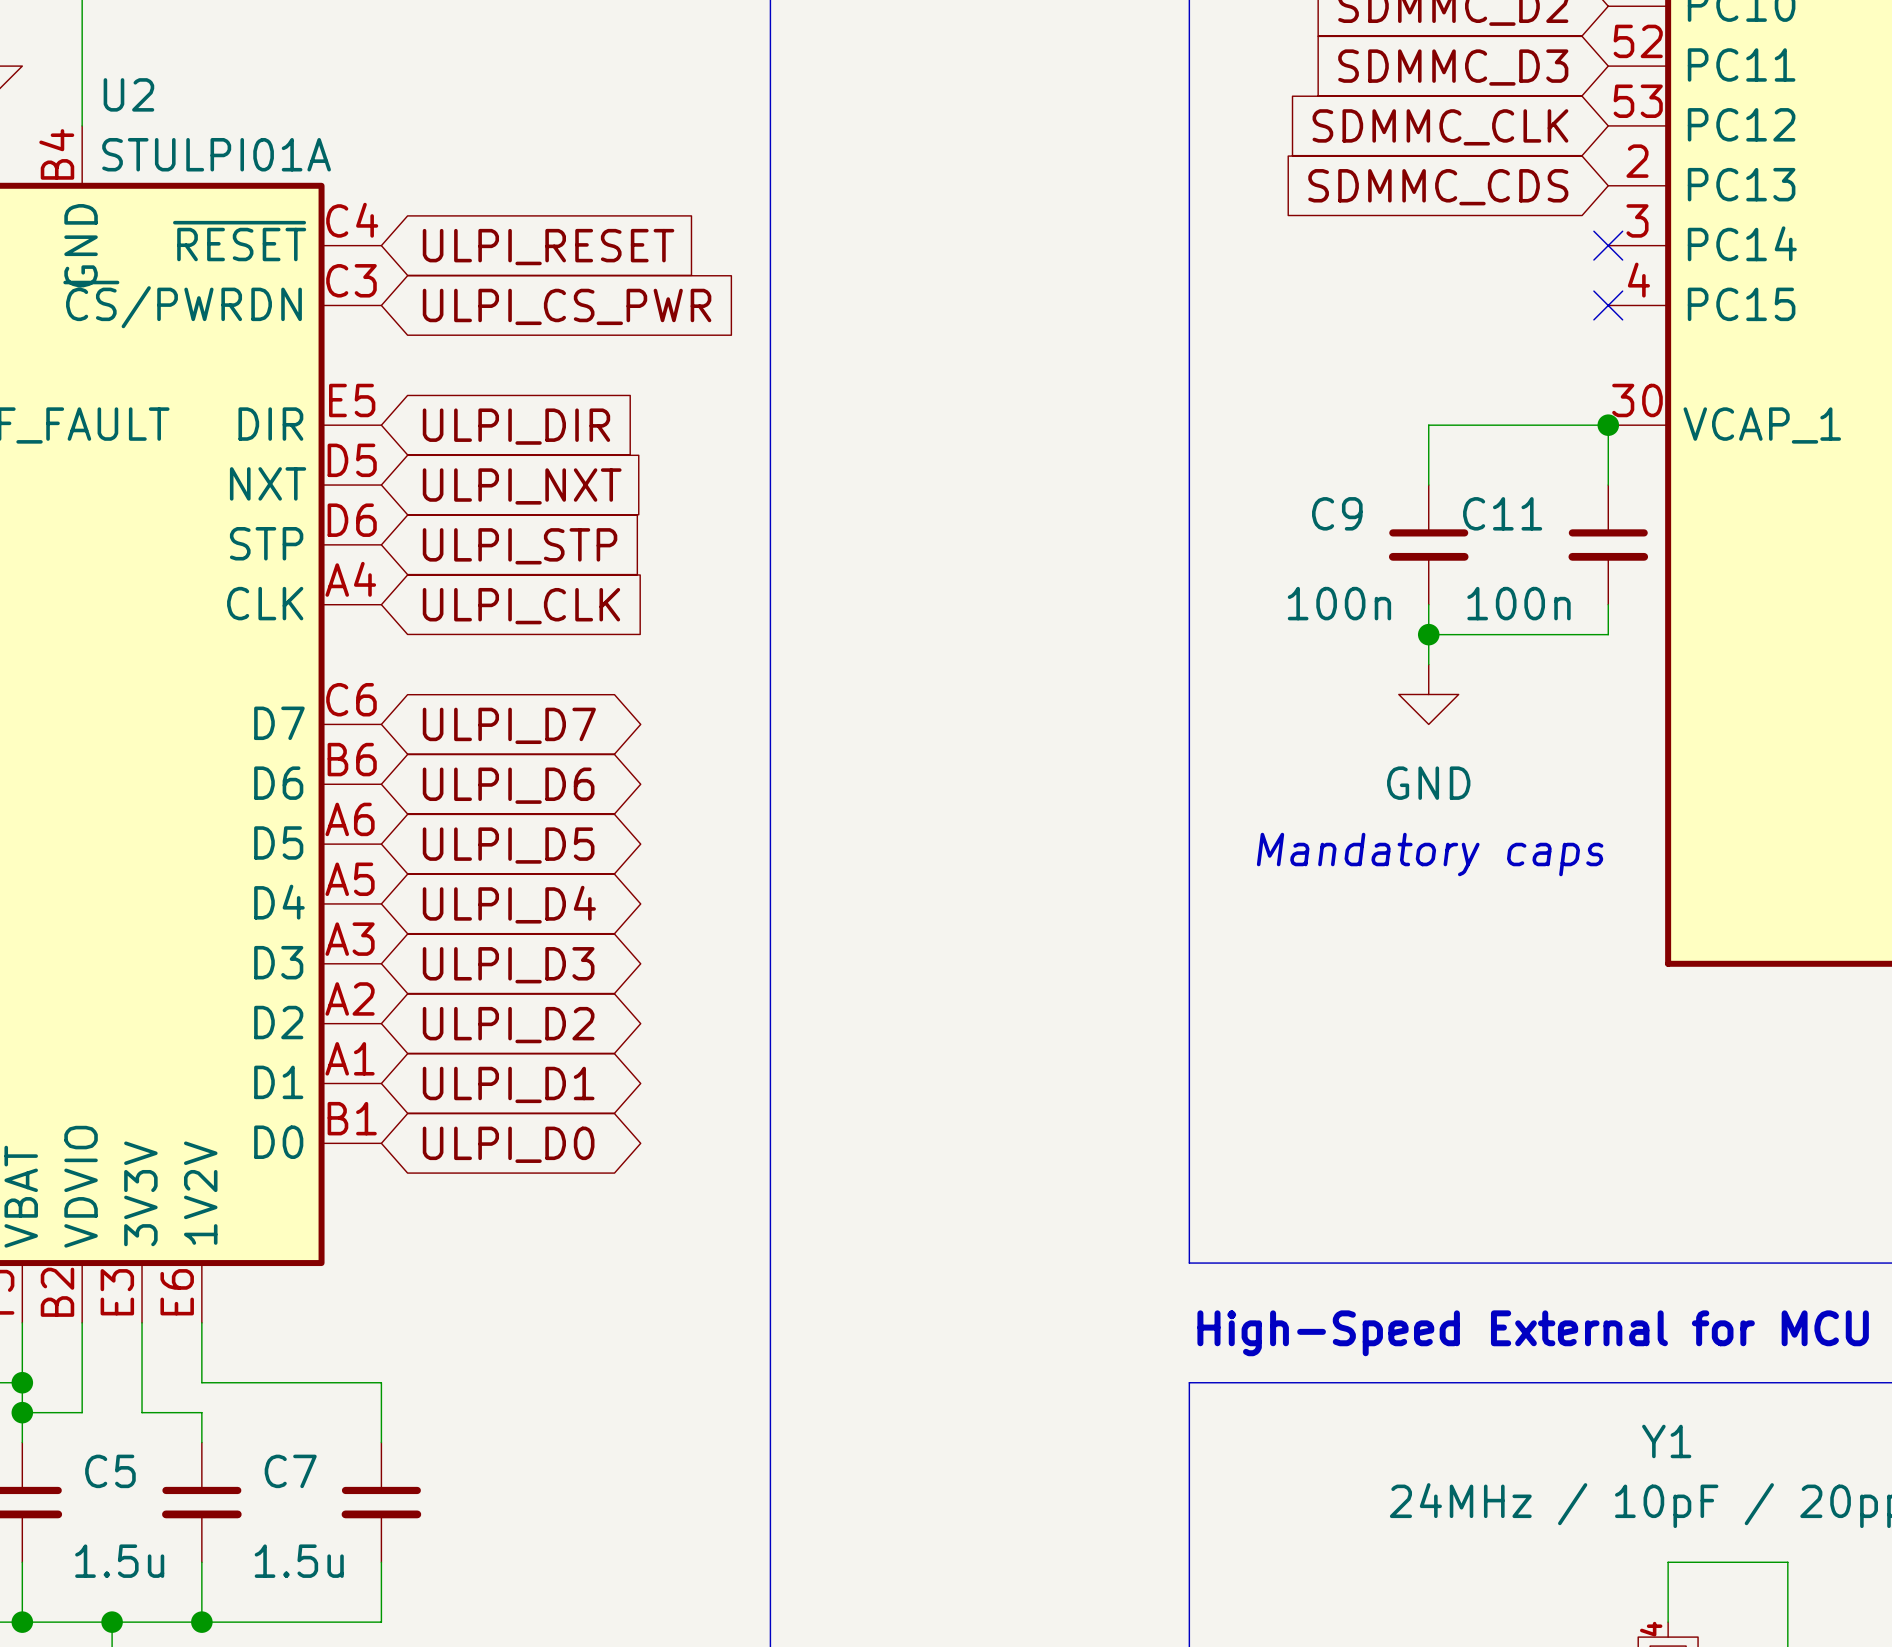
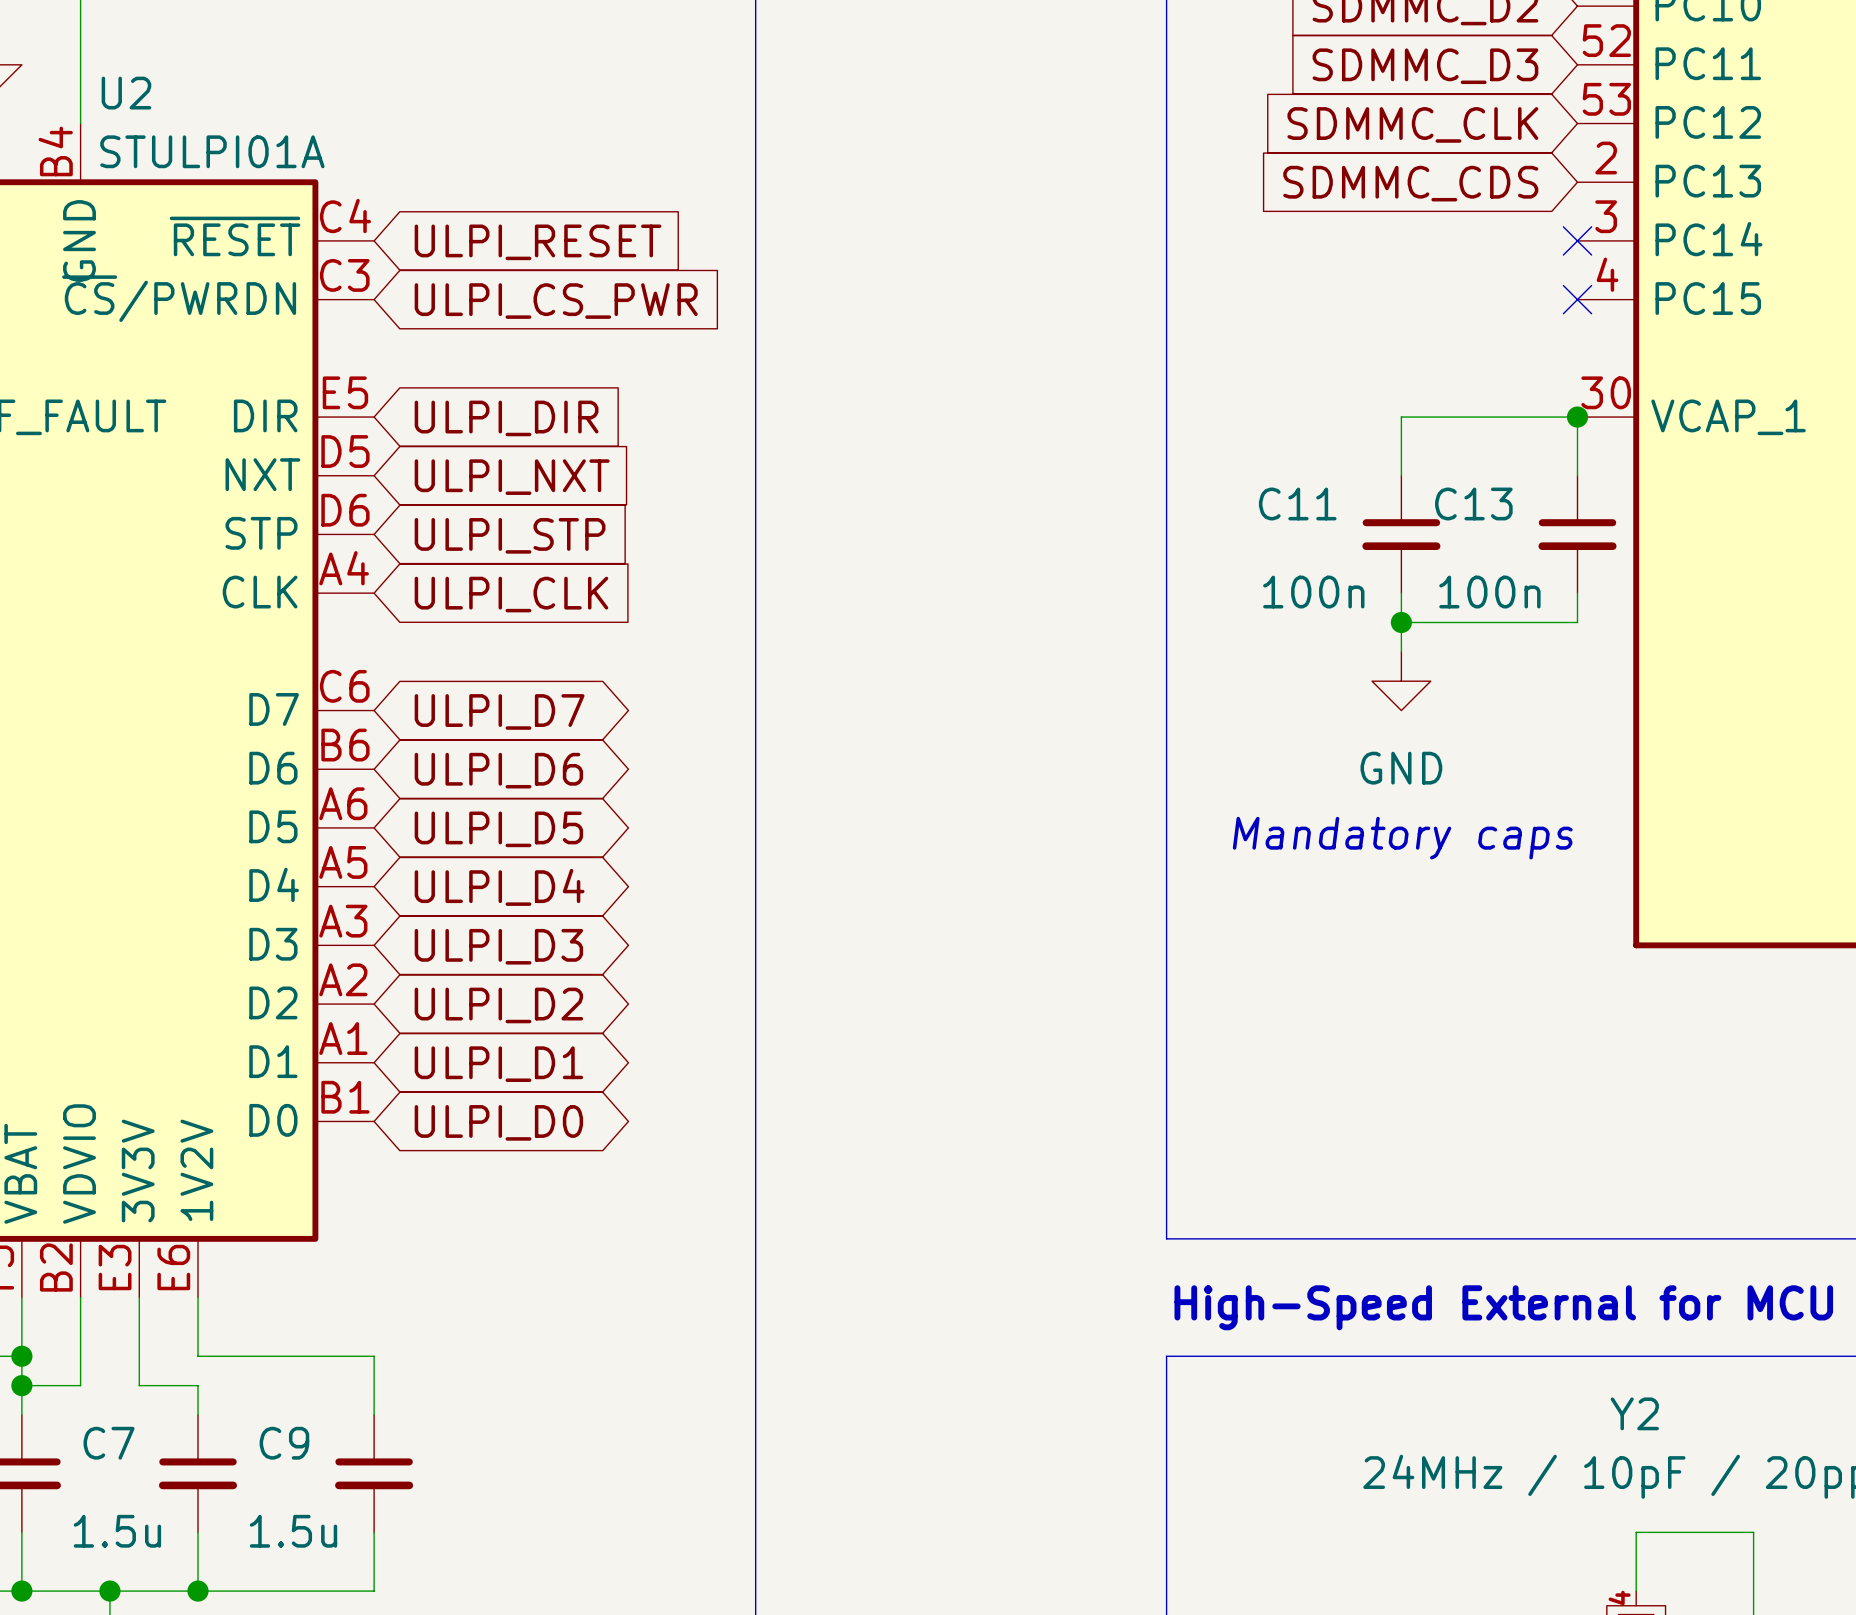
C9 name: C9 (1337, 513) -> C11 (1297, 503)
C11 name: C11 (1502, 513) -> C13 (1473, 503)
Y1 name: Y1 (1666, 1441) -> Y2 (1634, 1413)
C5 name: C5 (110, 1471) -> C7 (109, 1443)
C7 name: C7 (290, 1471) -> C9 (284, 1443)

